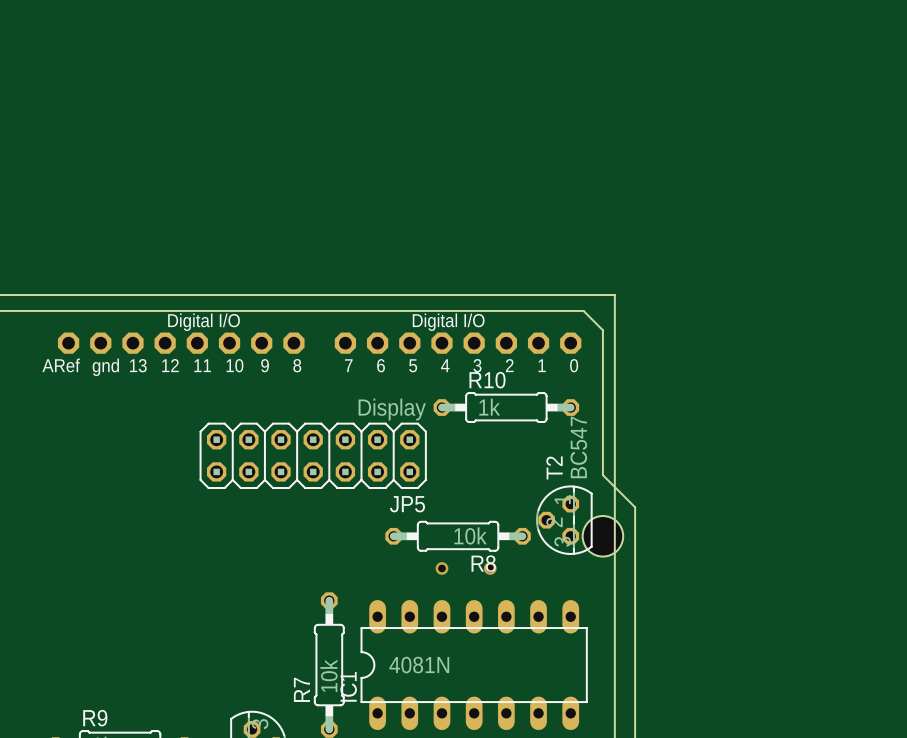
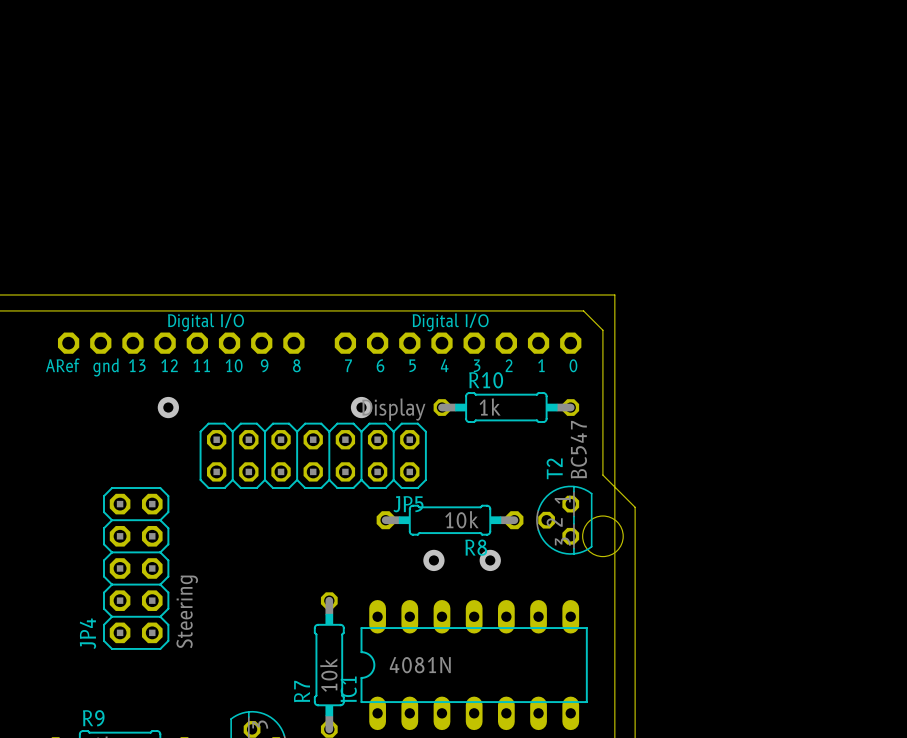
via: none -> (168, 407)
via: none -> (361, 407)
R8 footprint: [385, 520, 531, 552] -> [376, 504, 524, 536]
via size: [435, 562, 449, 575] -> [423, 549, 445, 572]
via size: [483, 562, 497, 575] -> [479, 549, 501, 572]
JP4: none -> Steering (136, 568)

